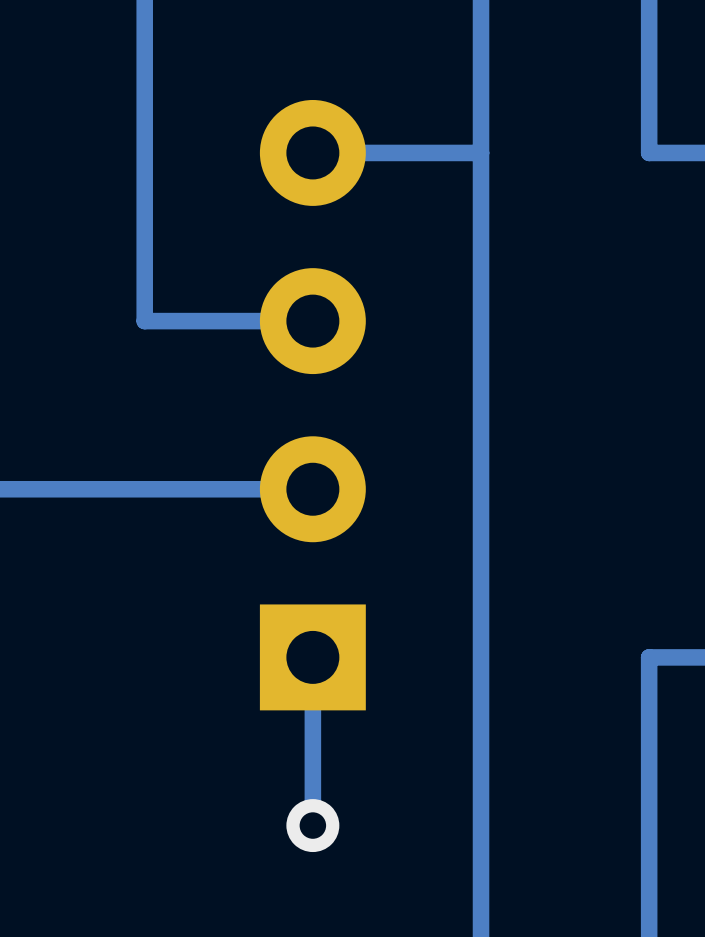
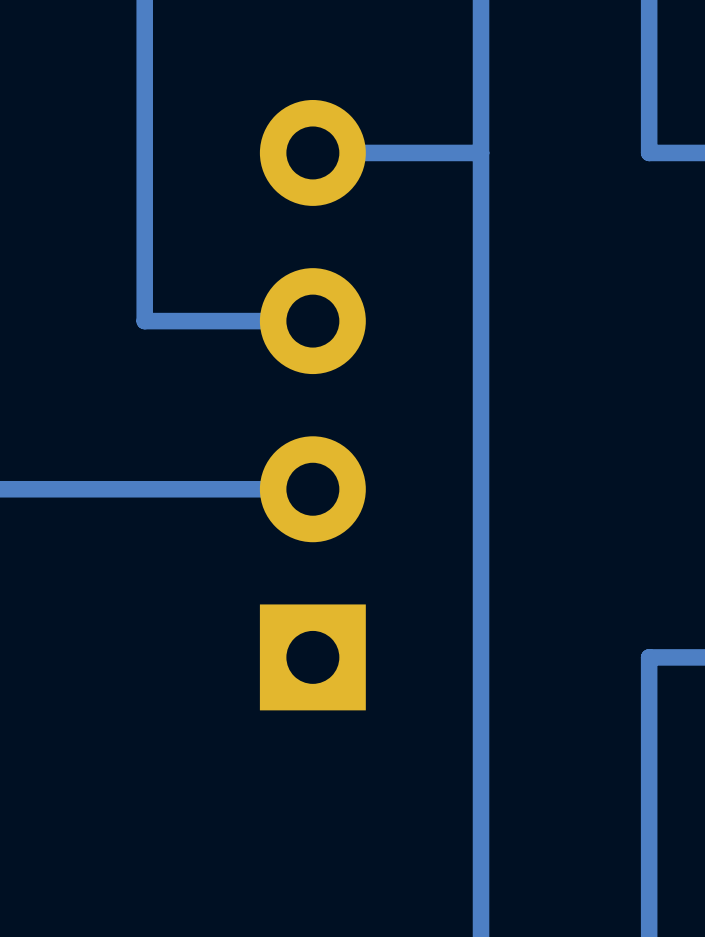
track: (312, 657) (312, 825) -> none
via: (312, 825) -> none

